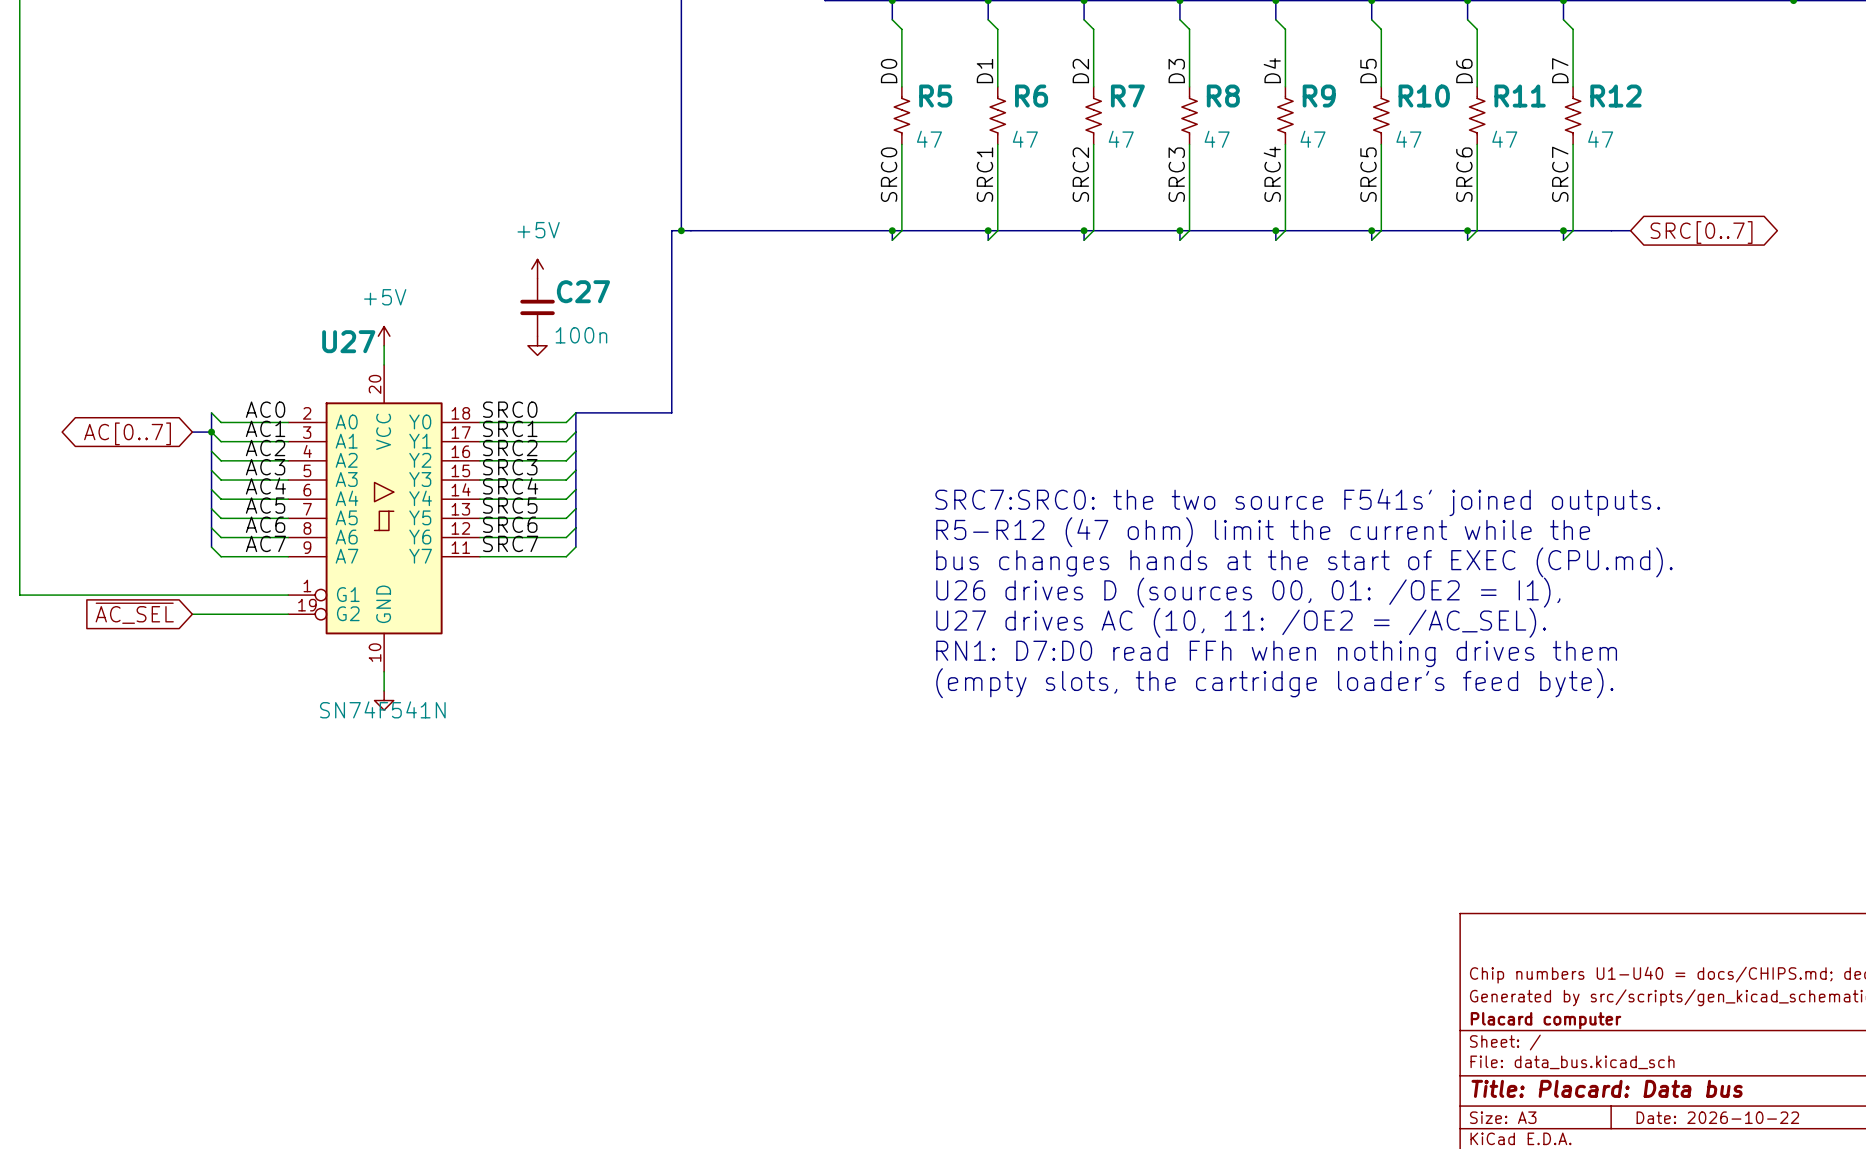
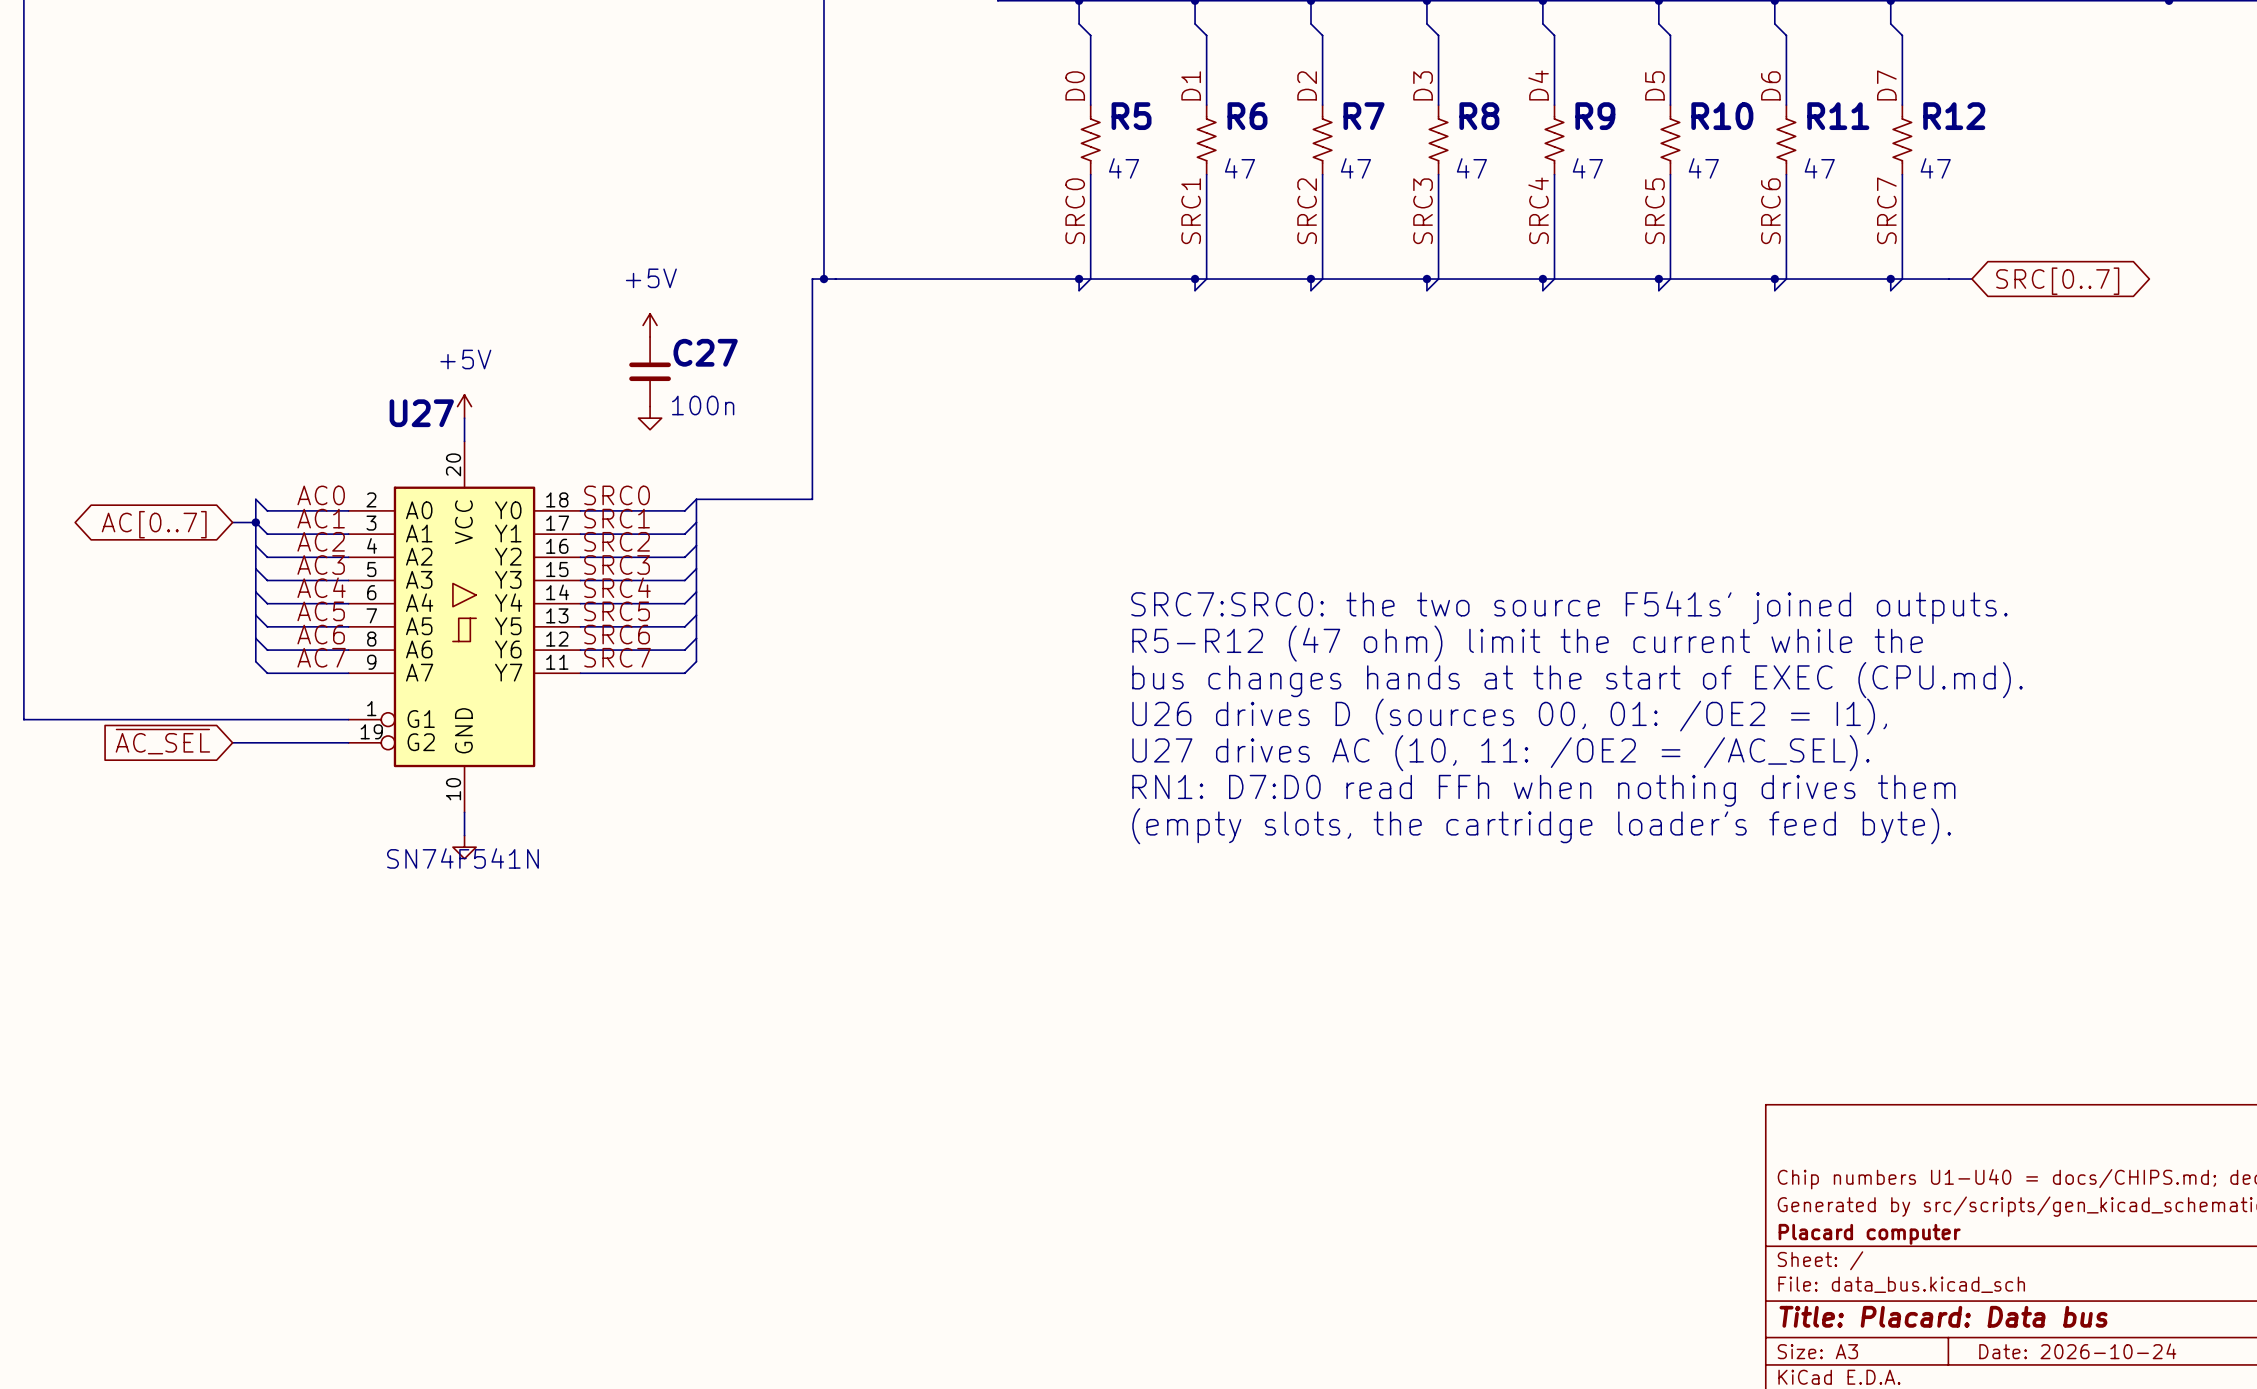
title block: Date: 2026-10-22 (1717, 1117) -> Date: 2026-10-24 (2077, 1351)

